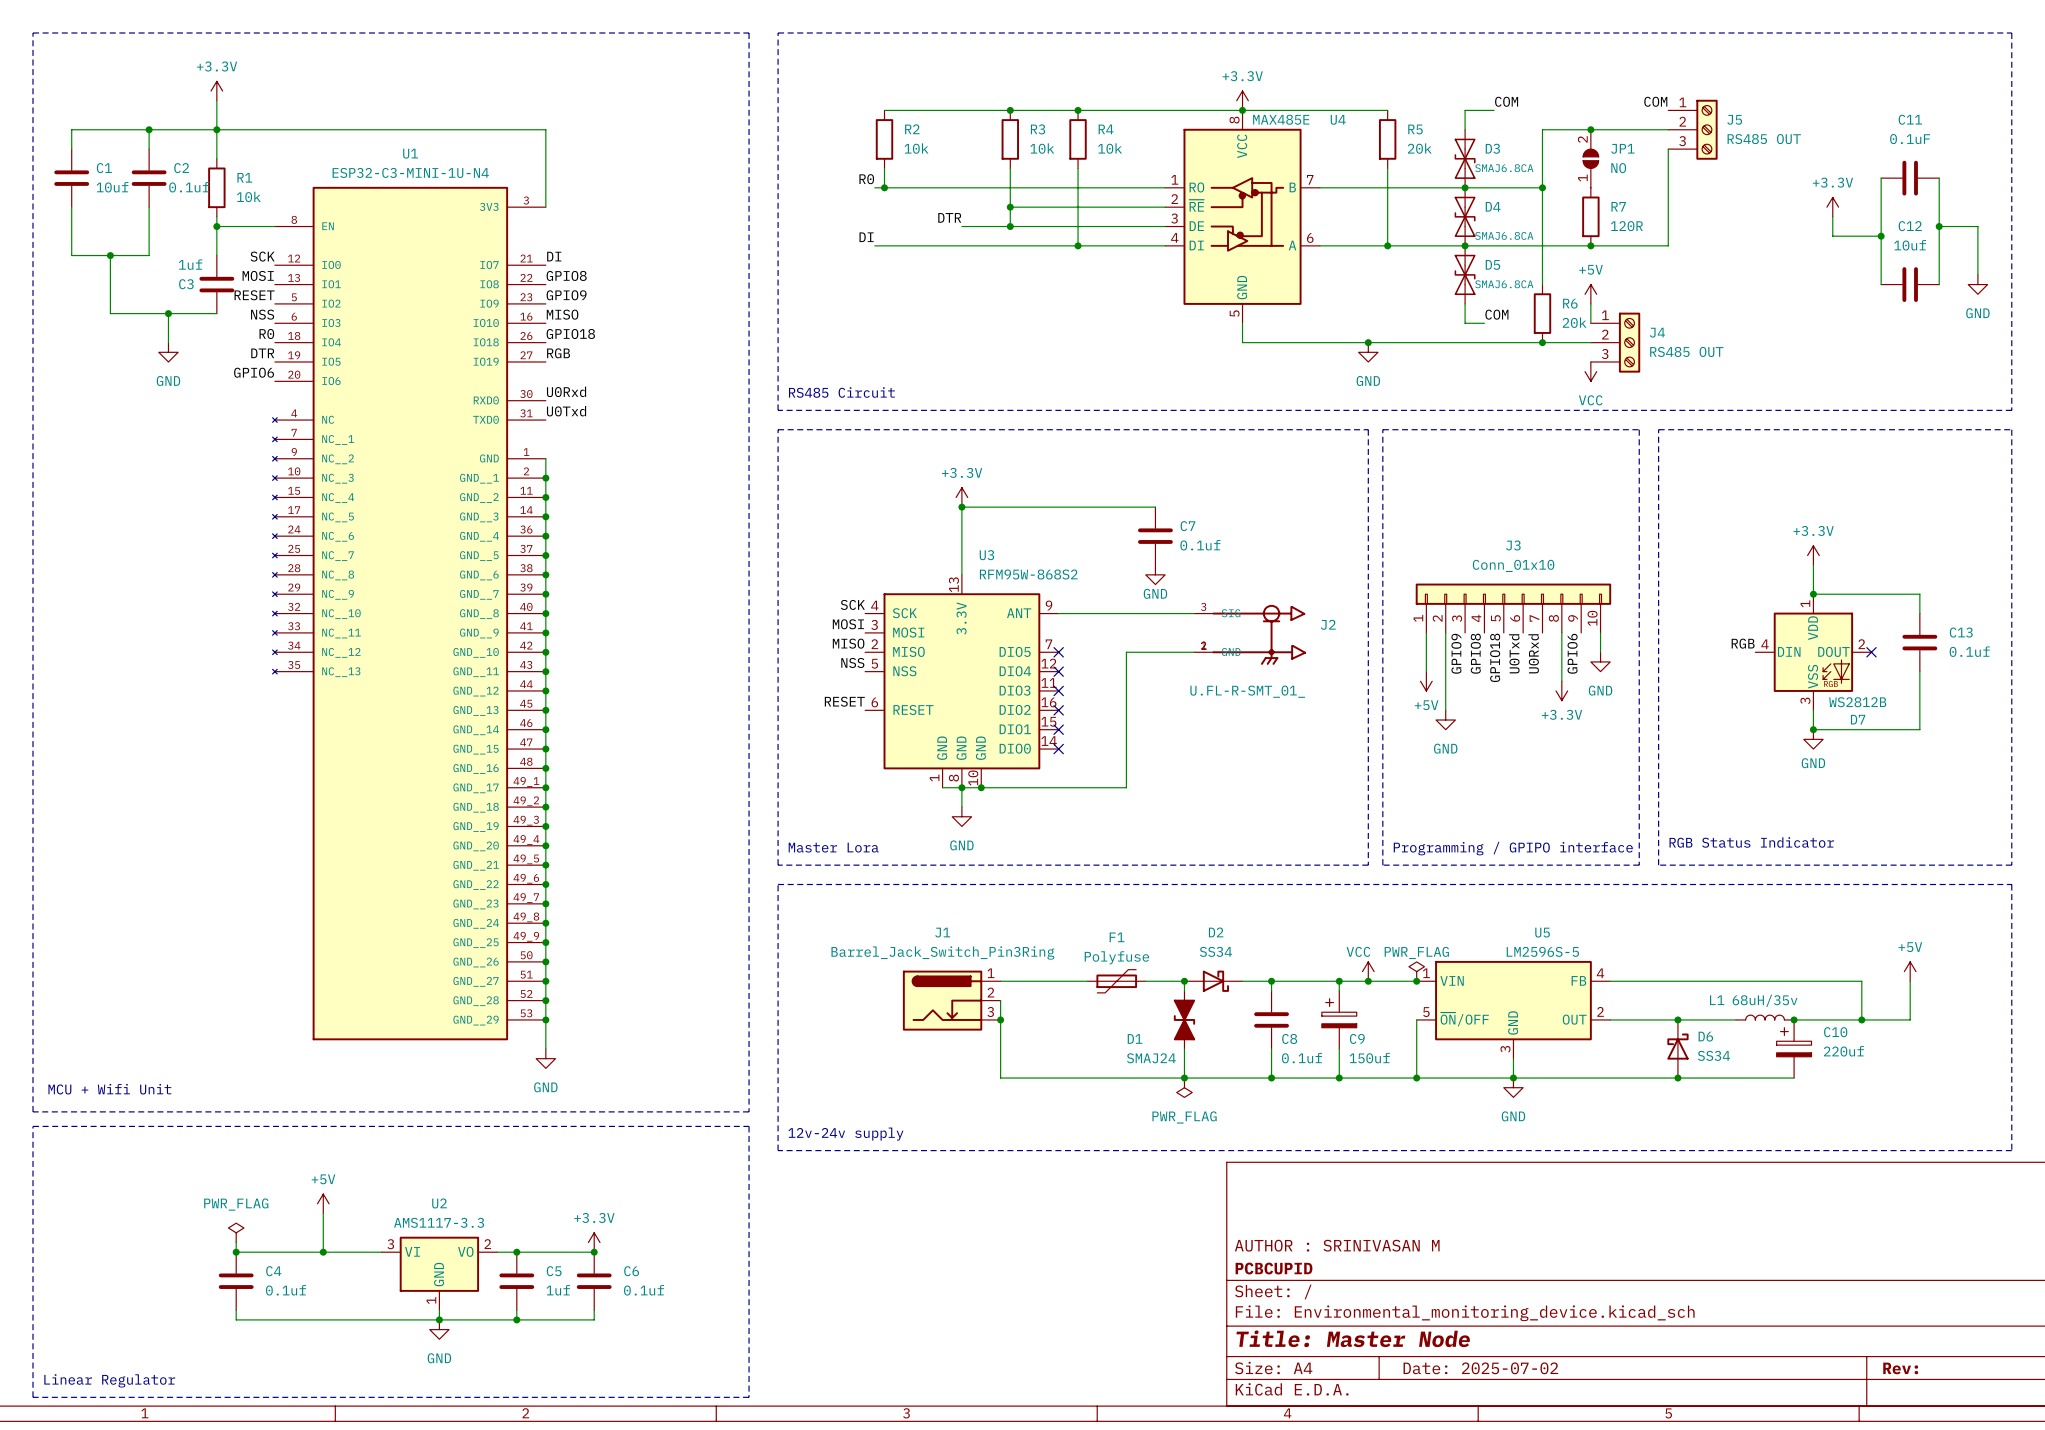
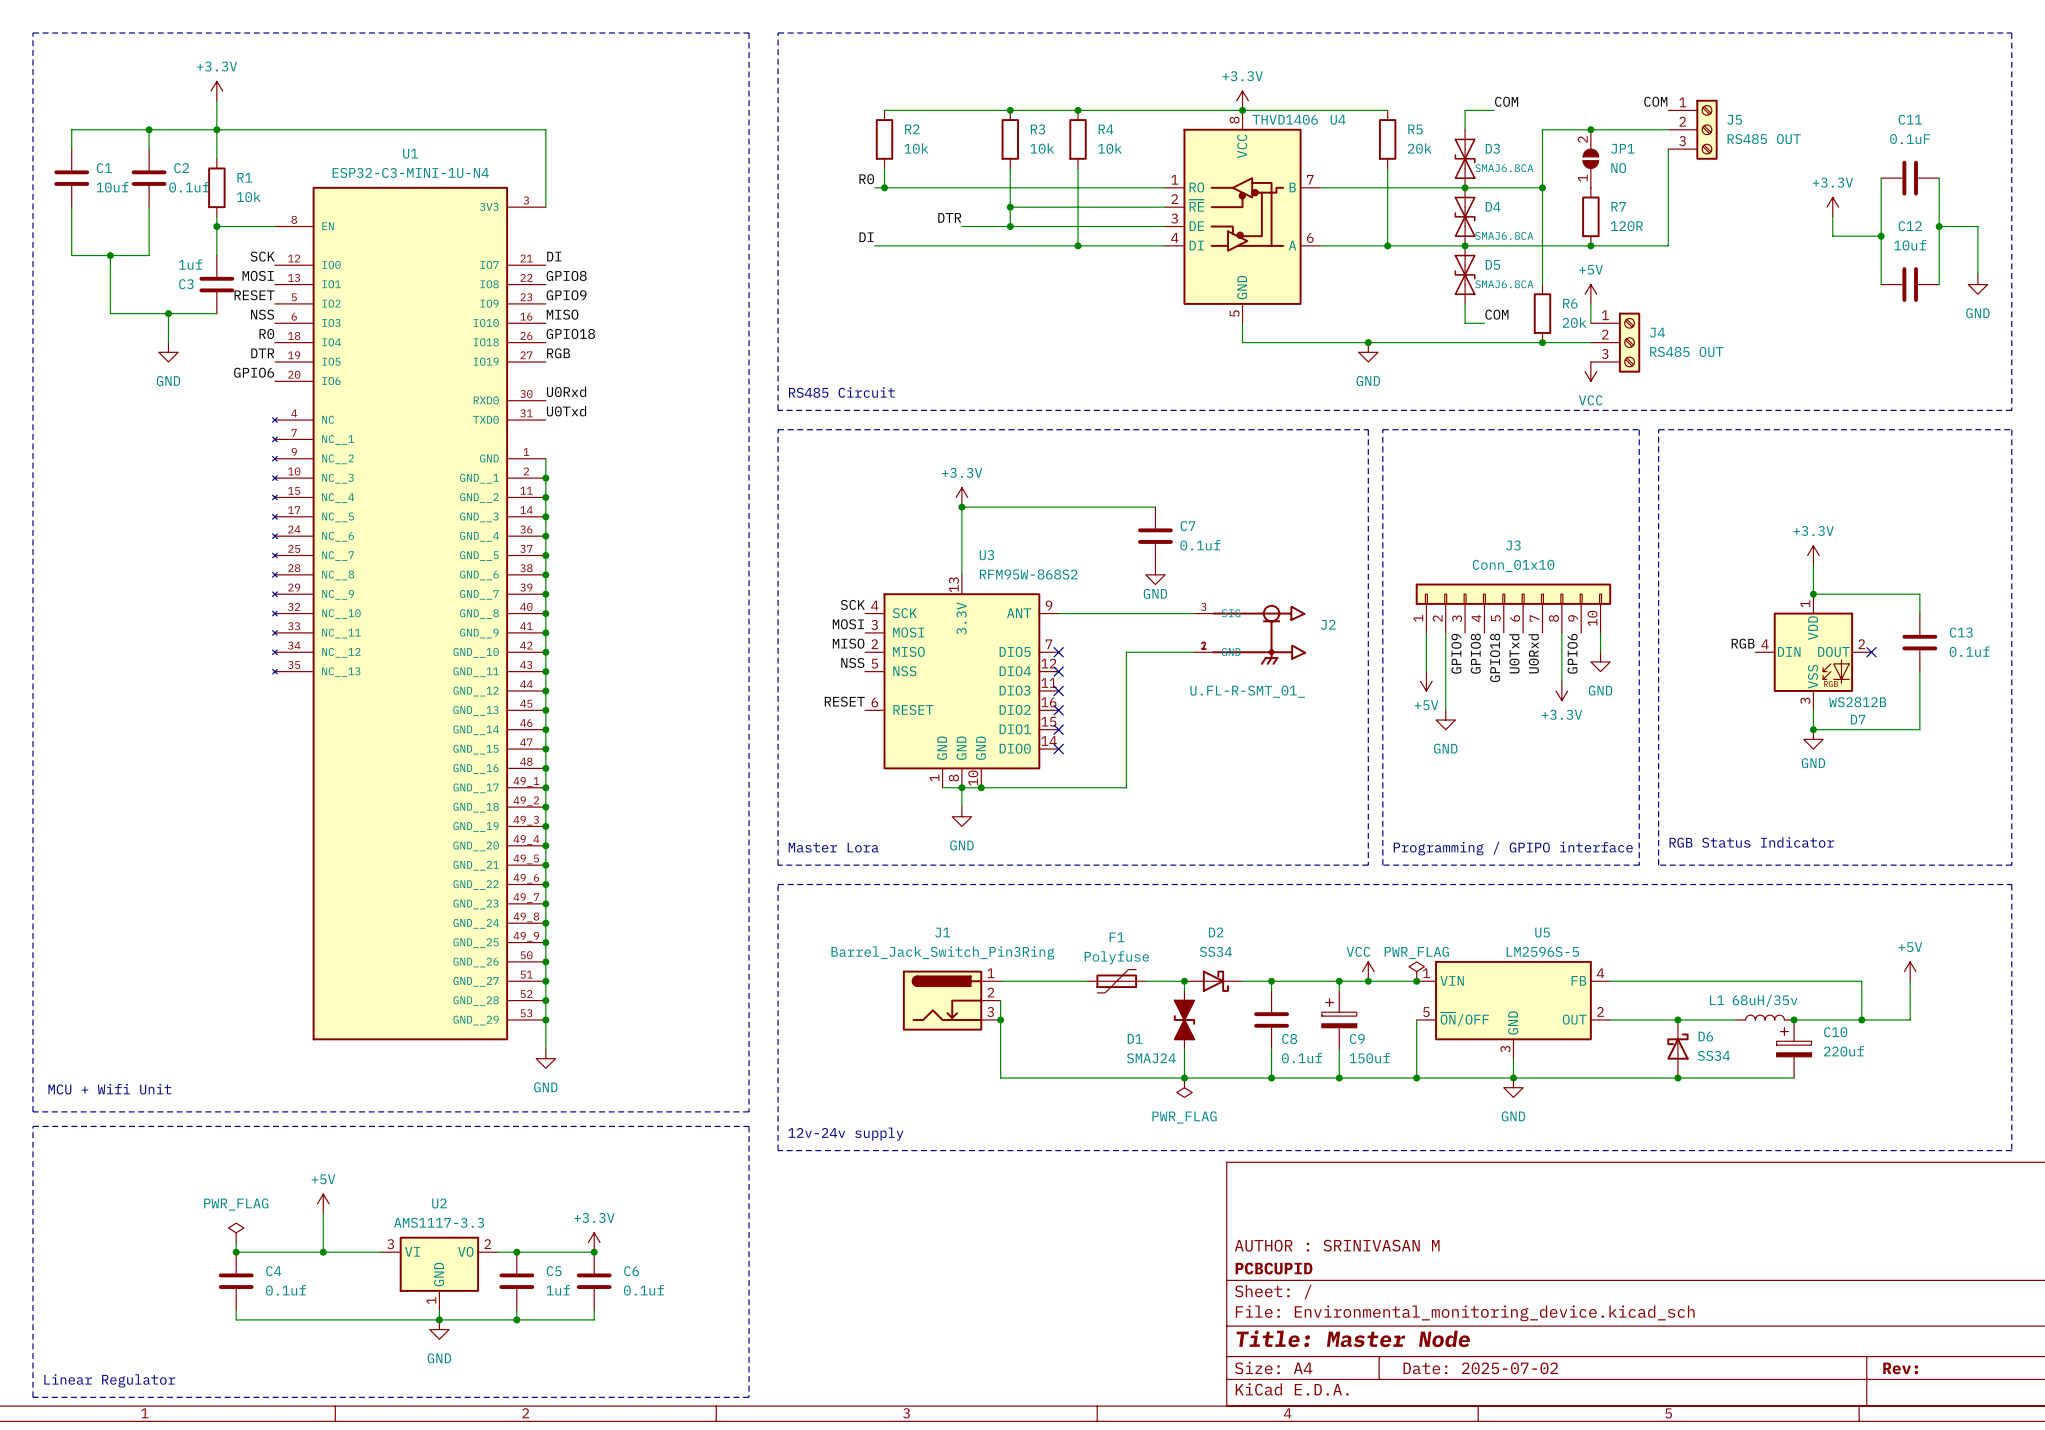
U4 value: MAX485E (1281, 119) -> THVD1406 (1285, 119)

